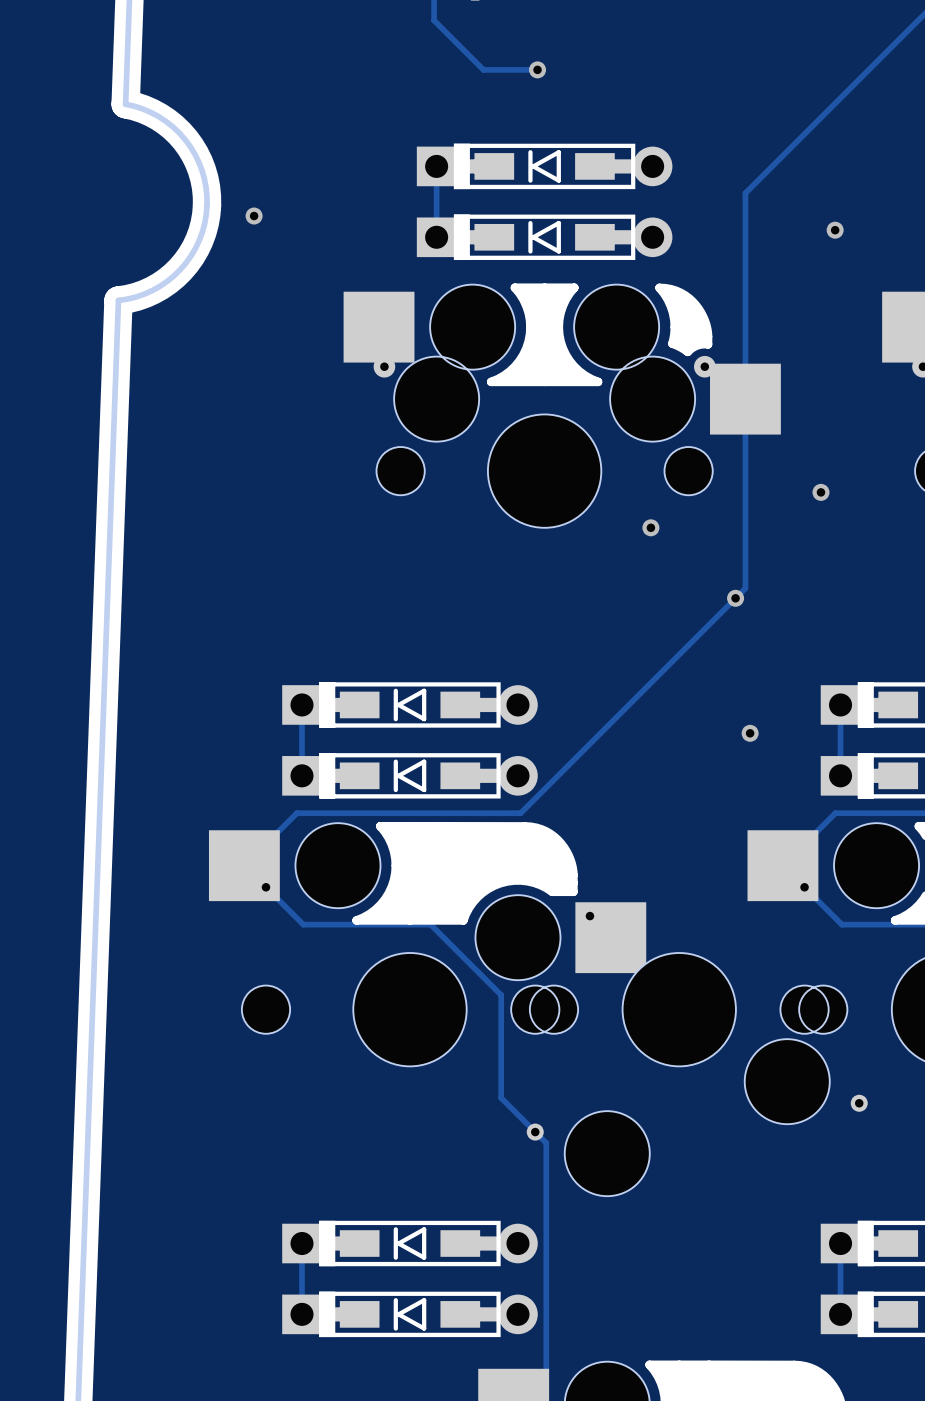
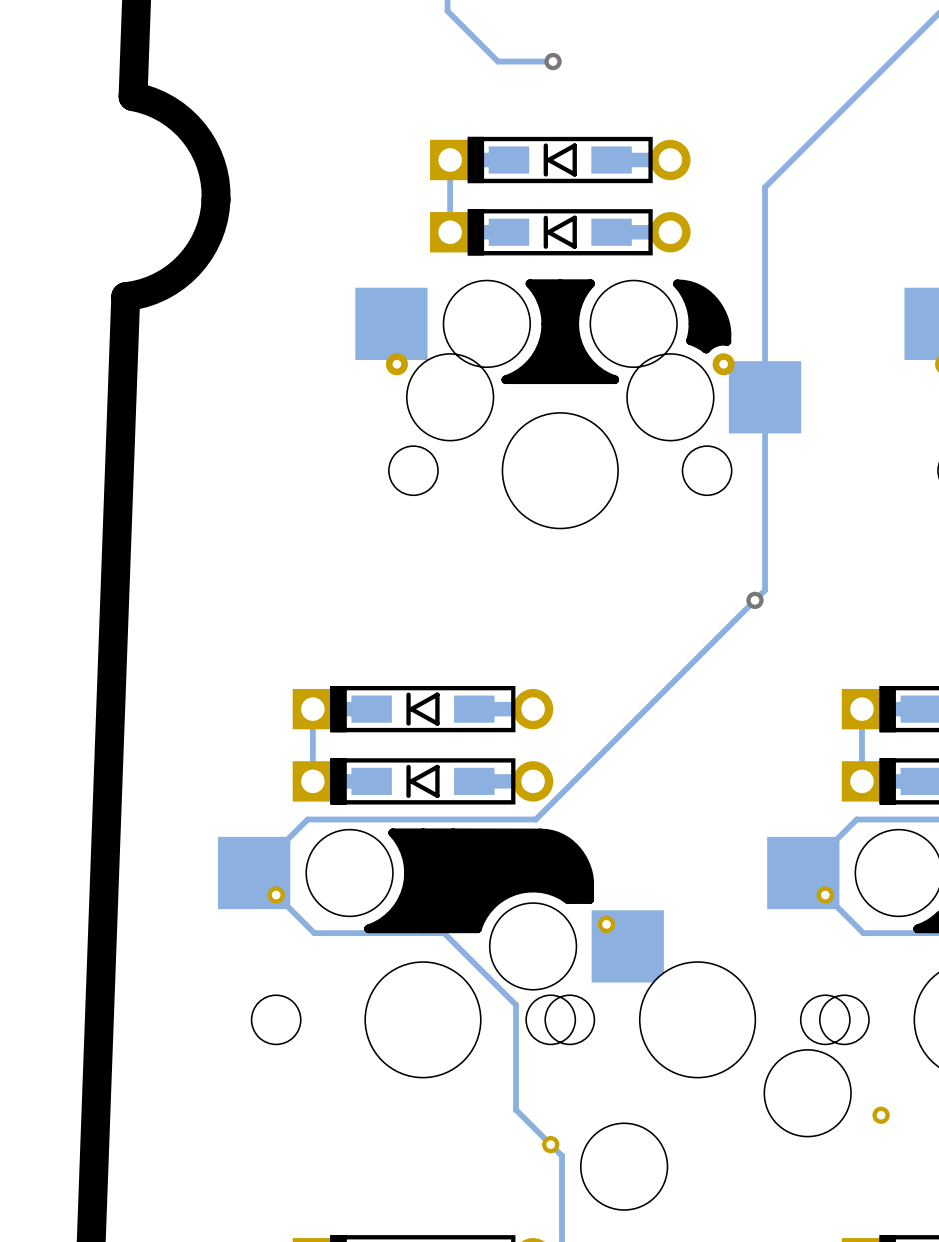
via: (254, 216) -> none
via: (835, 230) -> none
via: (820, 492) -> none
via: (650, 527) -> none
via: (750, 733) -> none

